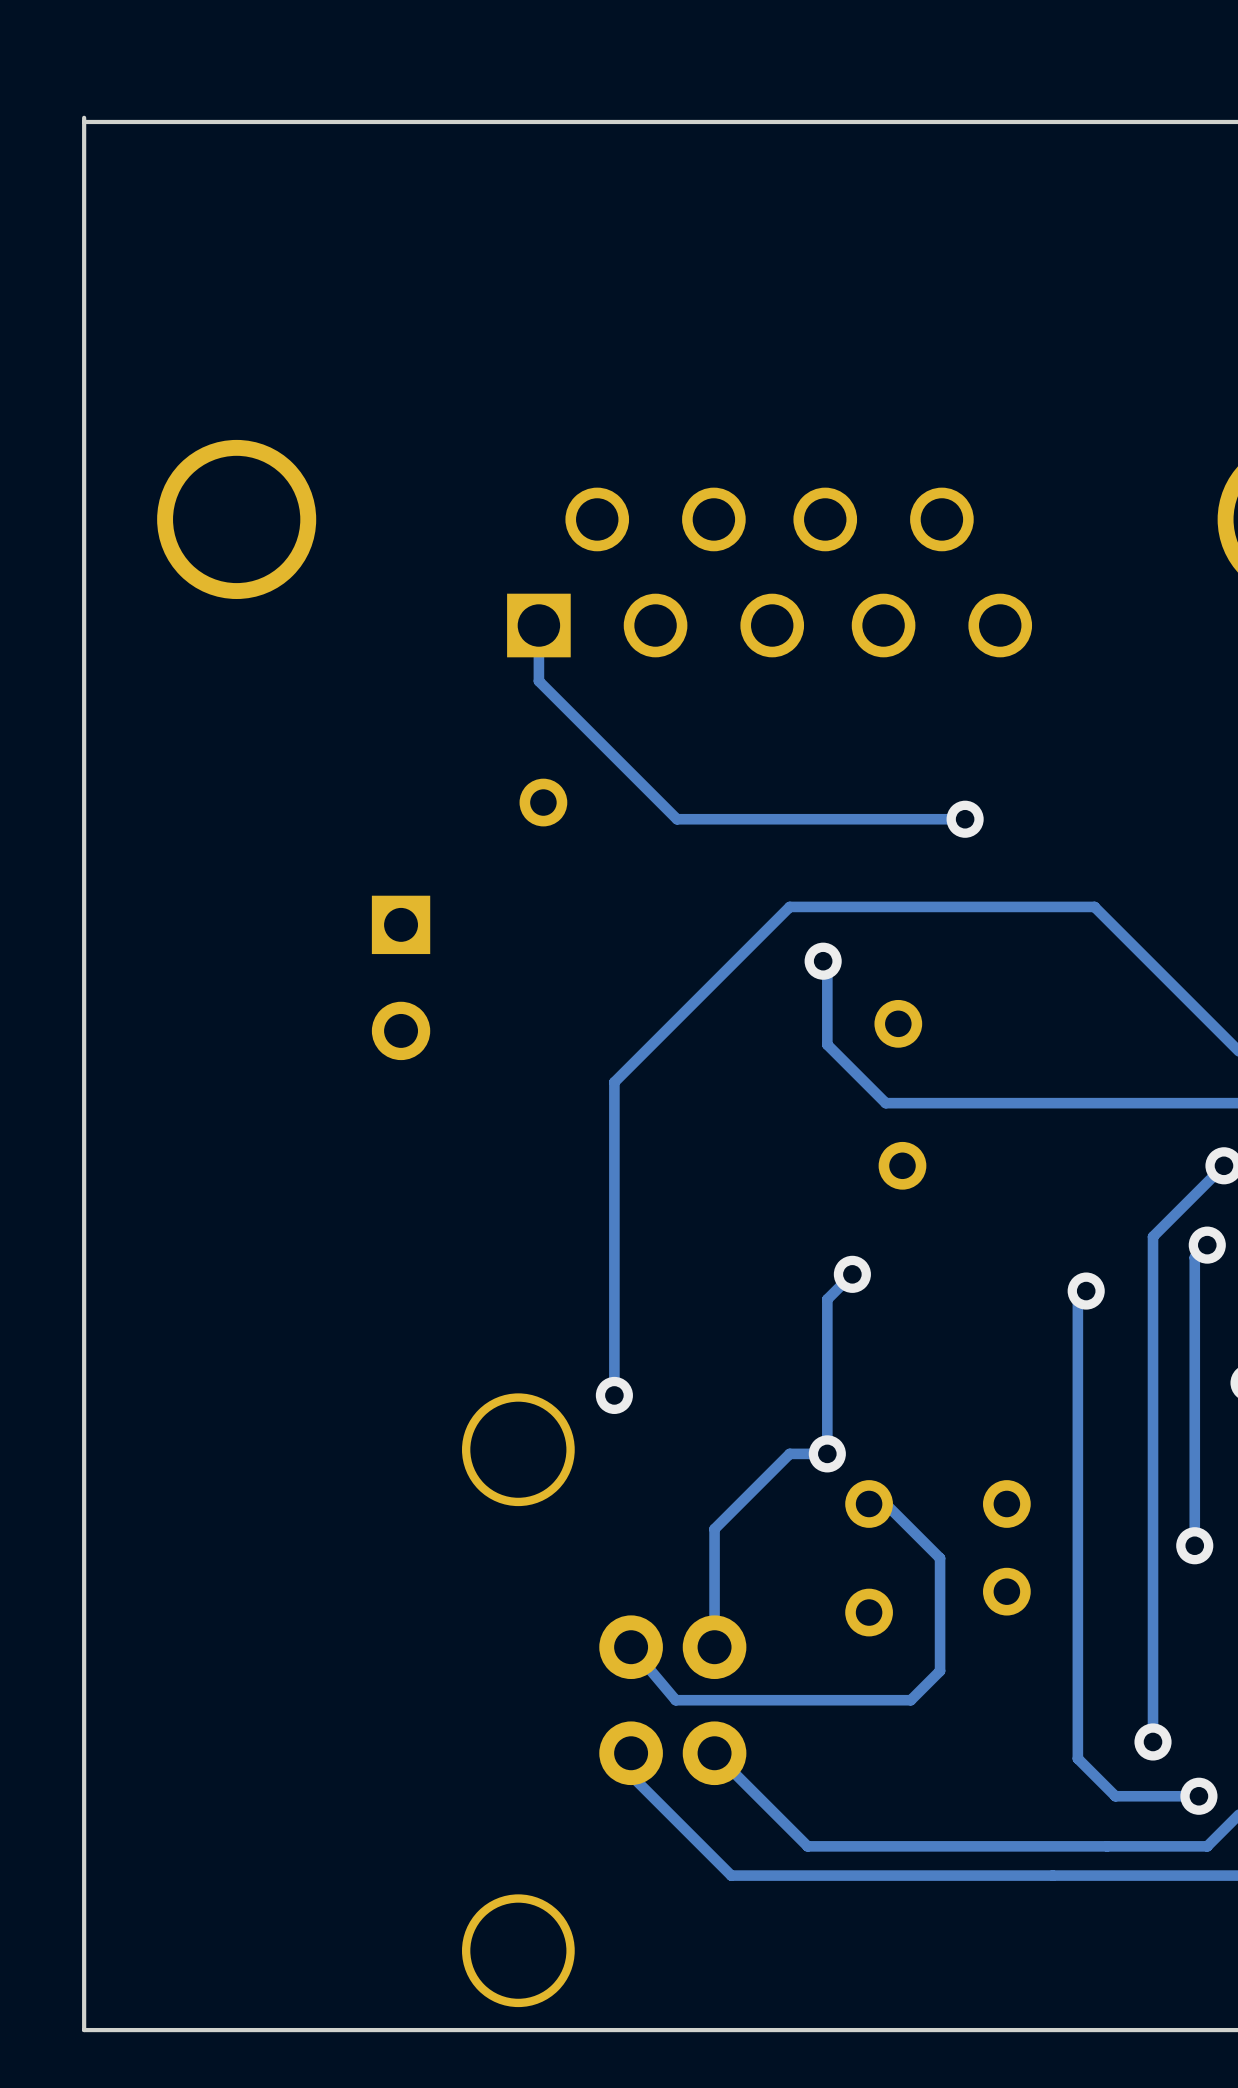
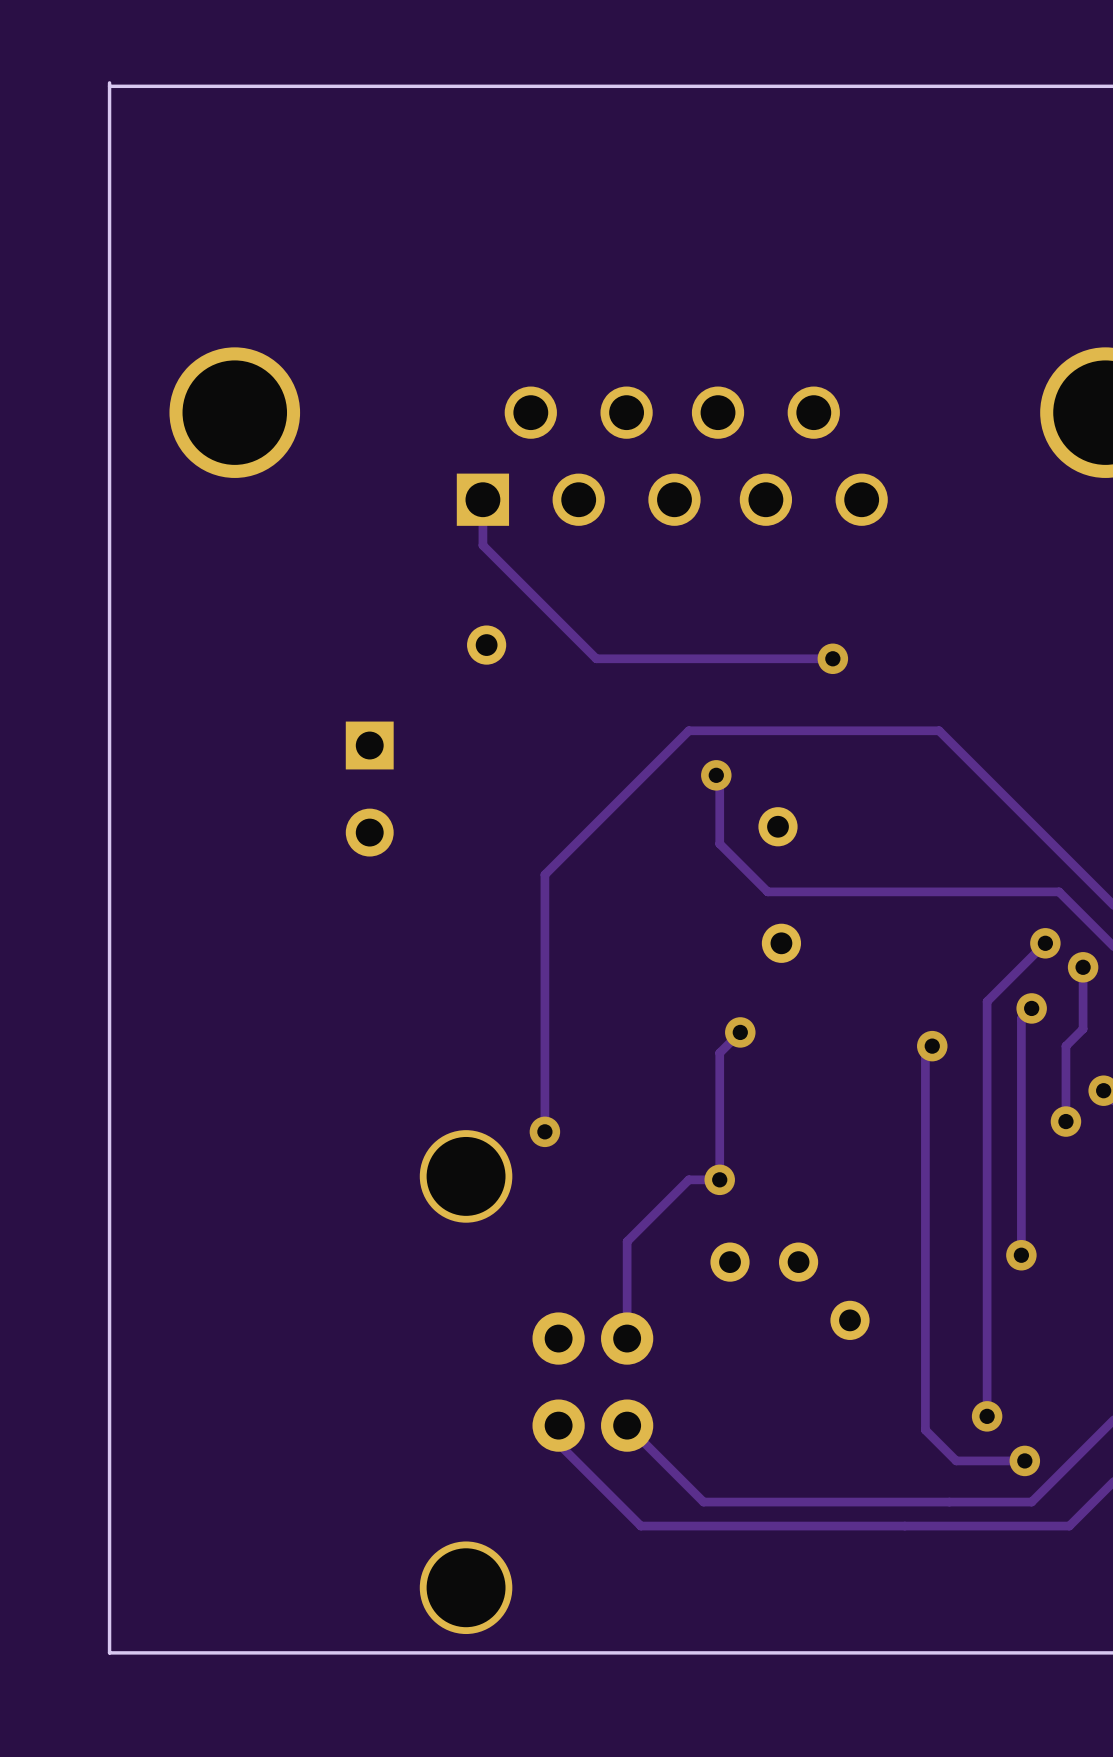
track: (869, 1503) (885, 1503) (940, 1558) (940, 1671) (910, 1700) (675, 1700) (631, 1647) -> none
part: (869, 1503) -> none
part: (1006, 1503) -> none
part: none -> (730, 1262)
part: none -> (798, 1262)
part position: (1006, 1591) -> (849, 1320)
part: (869, 1612) -> none

